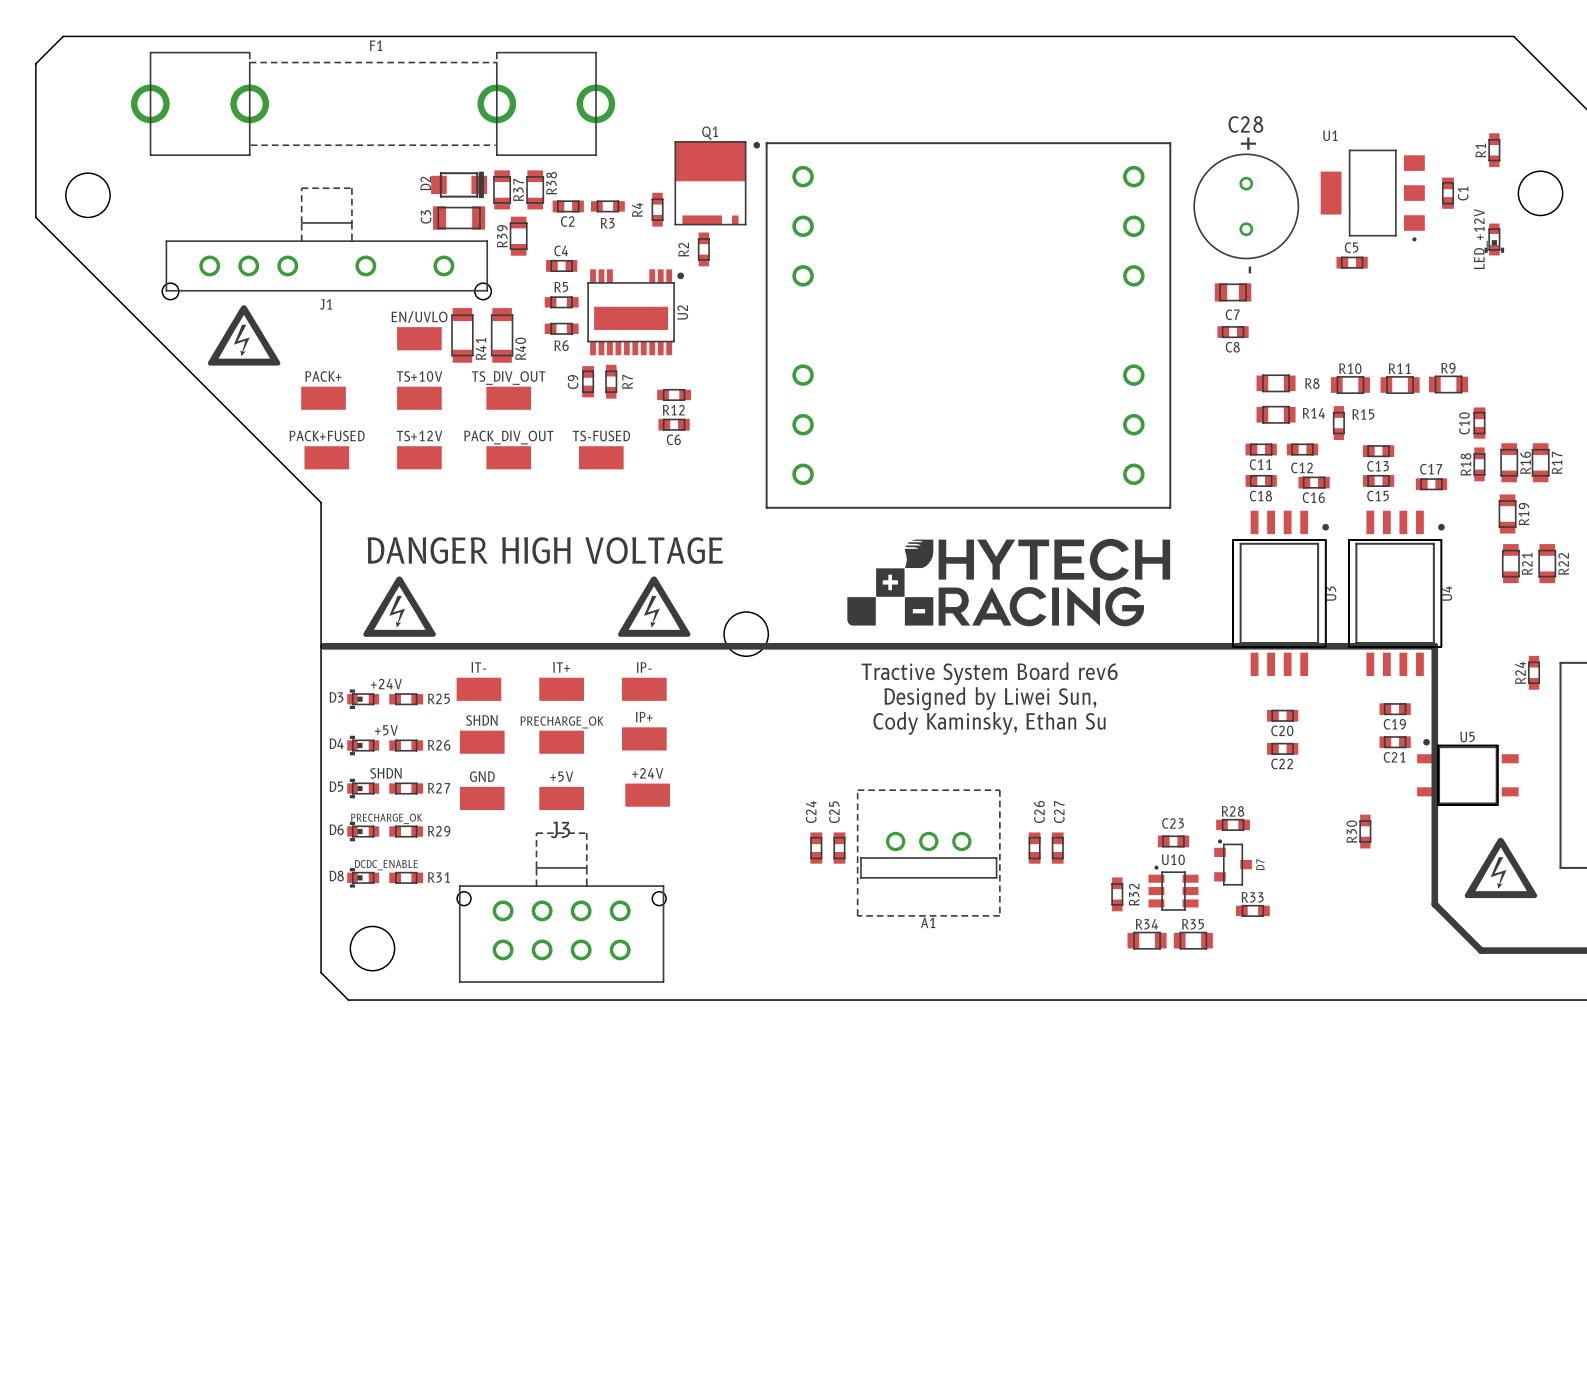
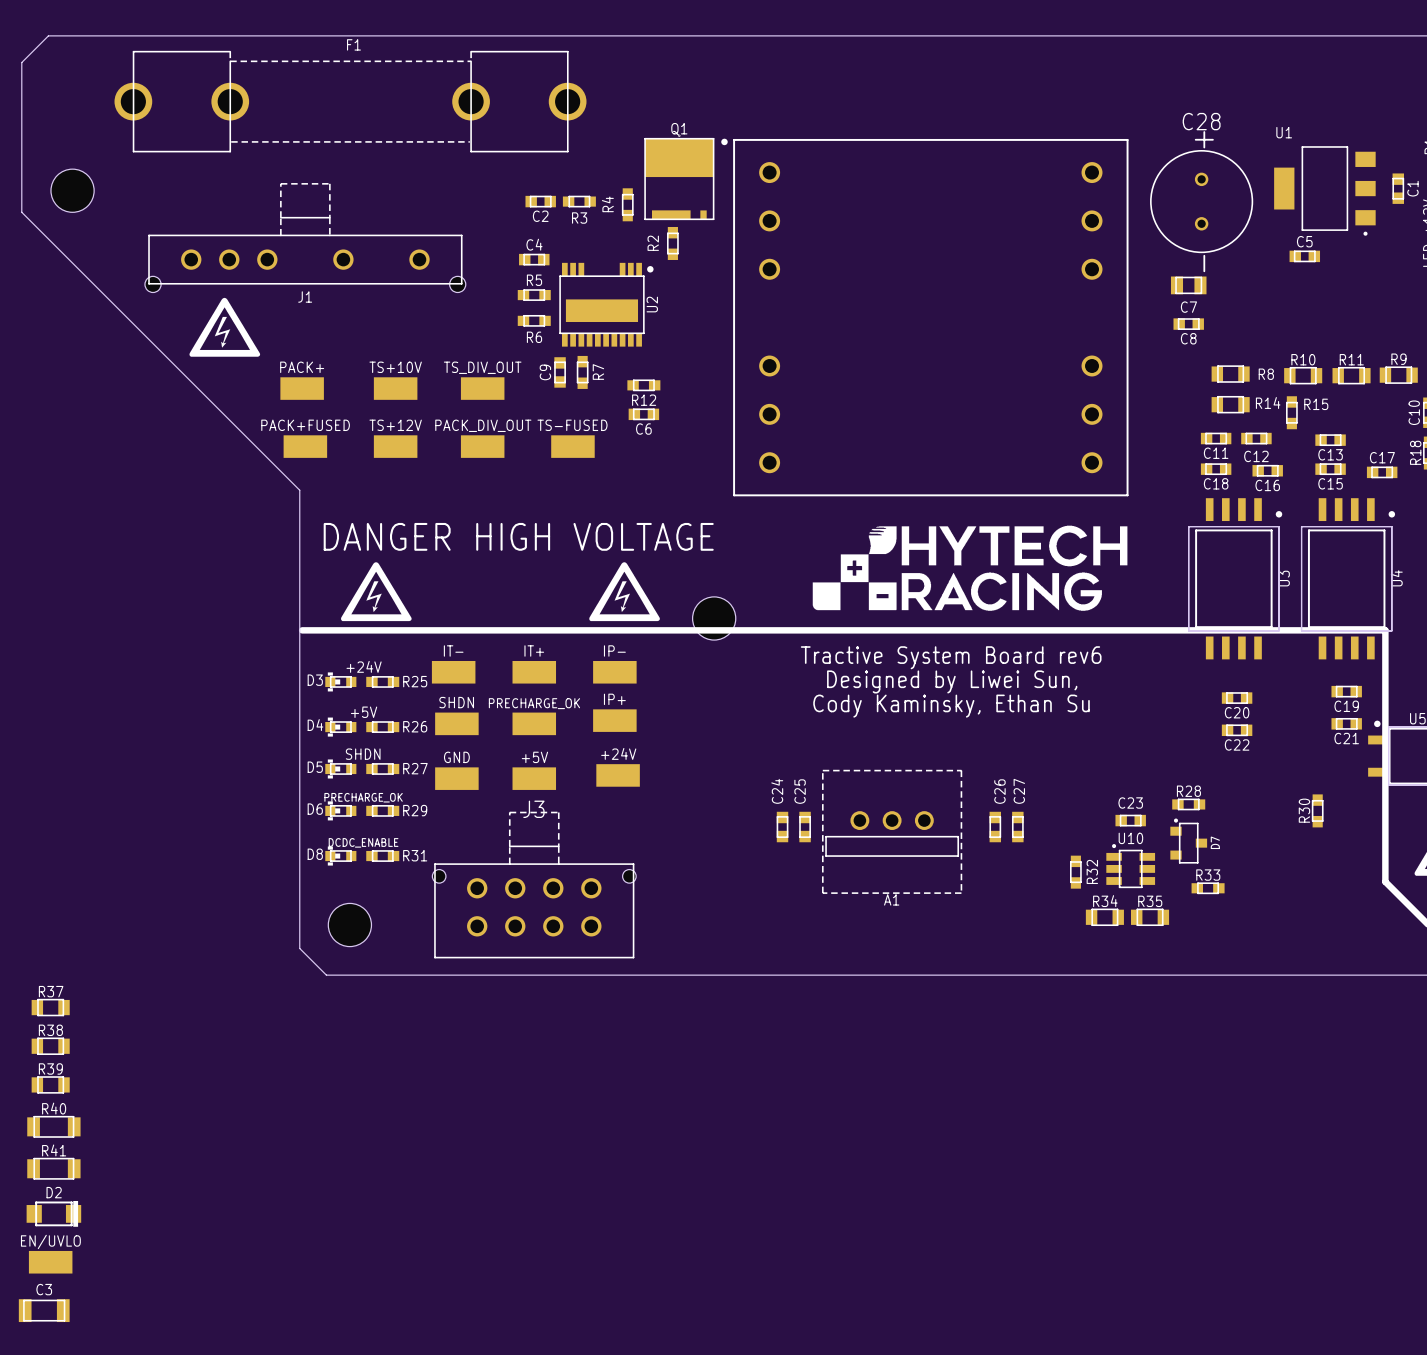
D2 name rotation: 0° (425, 183) -> 90° clockwise (54, 1192)
D2 name position: D2 (425, 183) -> D2 (54, 1192)
D2 position: (459, 184) -> (53, 1213)
R37 rotation: 0° (502, 189) -> 90° clockwise (50, 1007)
R37 position: (502, 189) -> (50, 1007)
R38 rotation: 0° (535, 189) -> 90° clockwise (50, 1046)
R38 position: (535, 189) -> (50, 1046)
C3 name rotation: 0° (426, 216) -> 90° clockwise (44, 1289)
C3 name position: C3 (426, 216) -> C3 (44, 1289)
C3 position: (459, 217) -> (44, 1310)
R39 rotation: 0° (518, 236) -> 90° clockwise (50, 1084)
R39 position: (518, 236) -> (50, 1084)
R41 rotation: 0° (462, 335) -> 90° clockwise (53, 1168)
R41 position: (462, 335) -> (53, 1168)
R40 rotation: 0° (502, 335) -> 90° clockwise (53, 1126)
R40 position: (502, 335) -> (53, 1126)
EN/UVLO: (419, 338) -> none
R41 name position: R41 (480, 348) -> R41 (54, 1150)
R40 name position: R40 (520, 348) -> R40 (54, 1108)
EN/UVLO: none -> (50, 1262)

